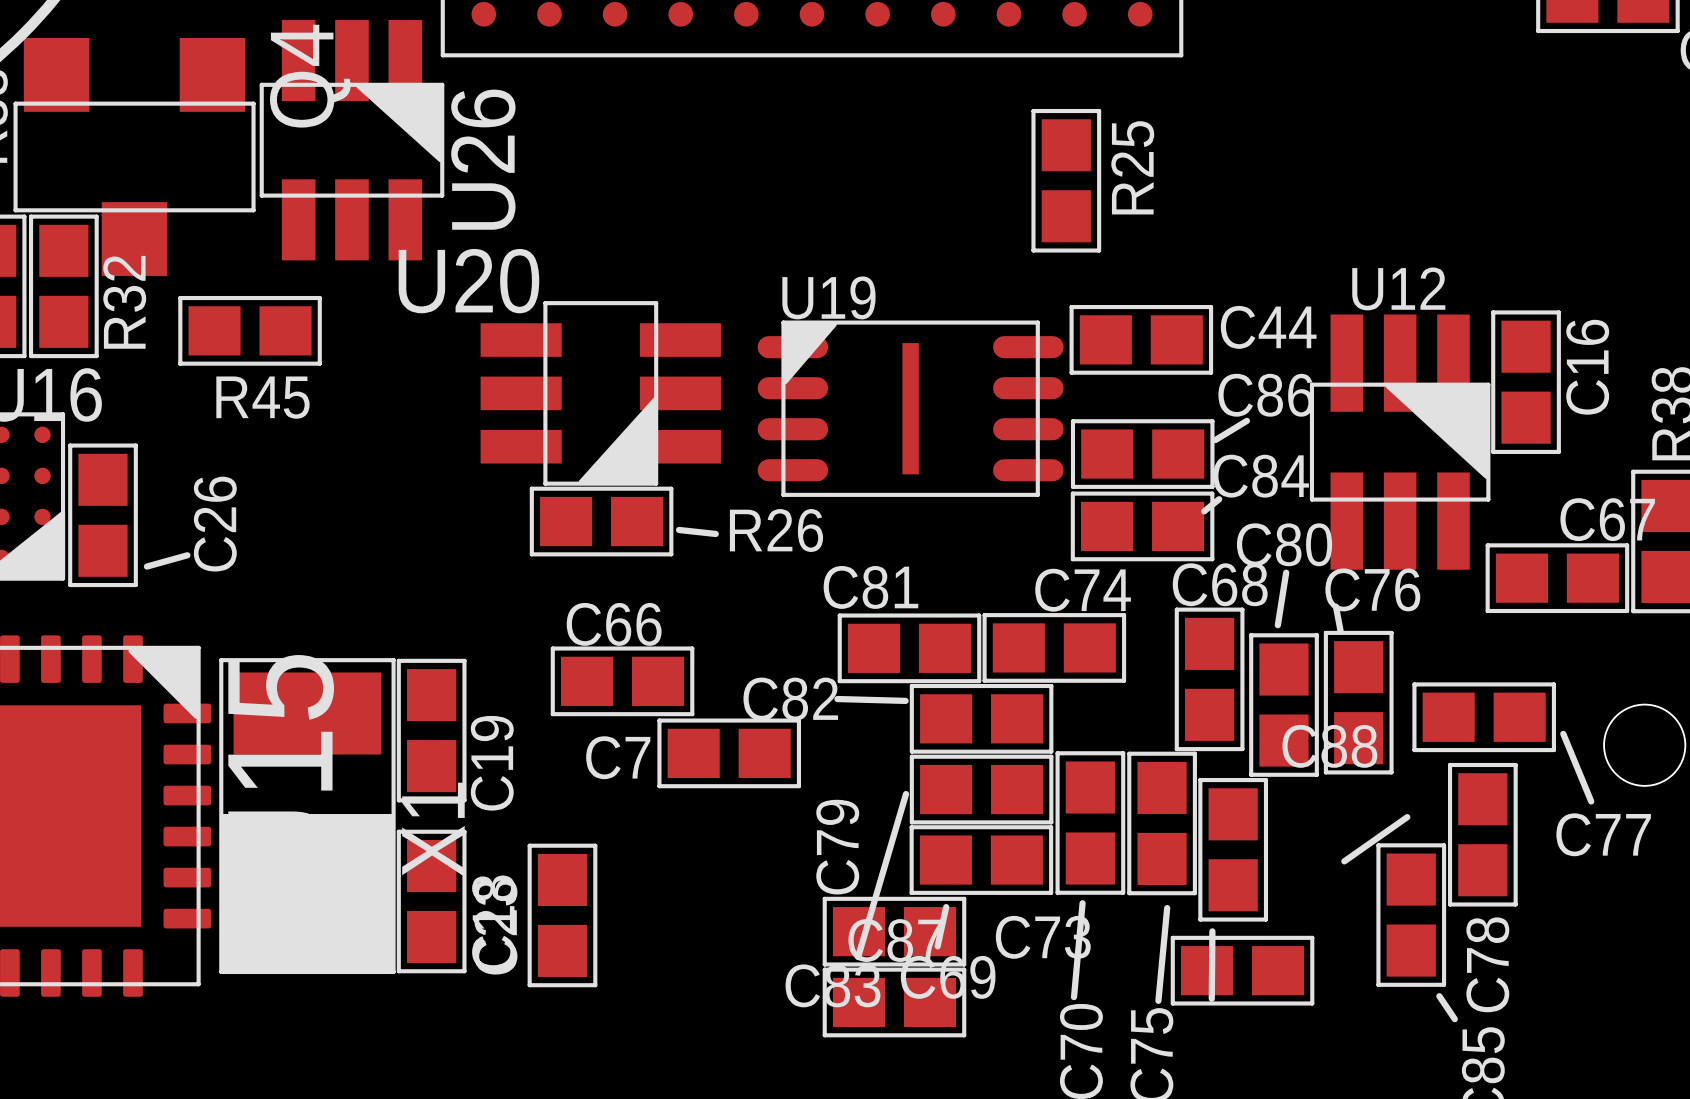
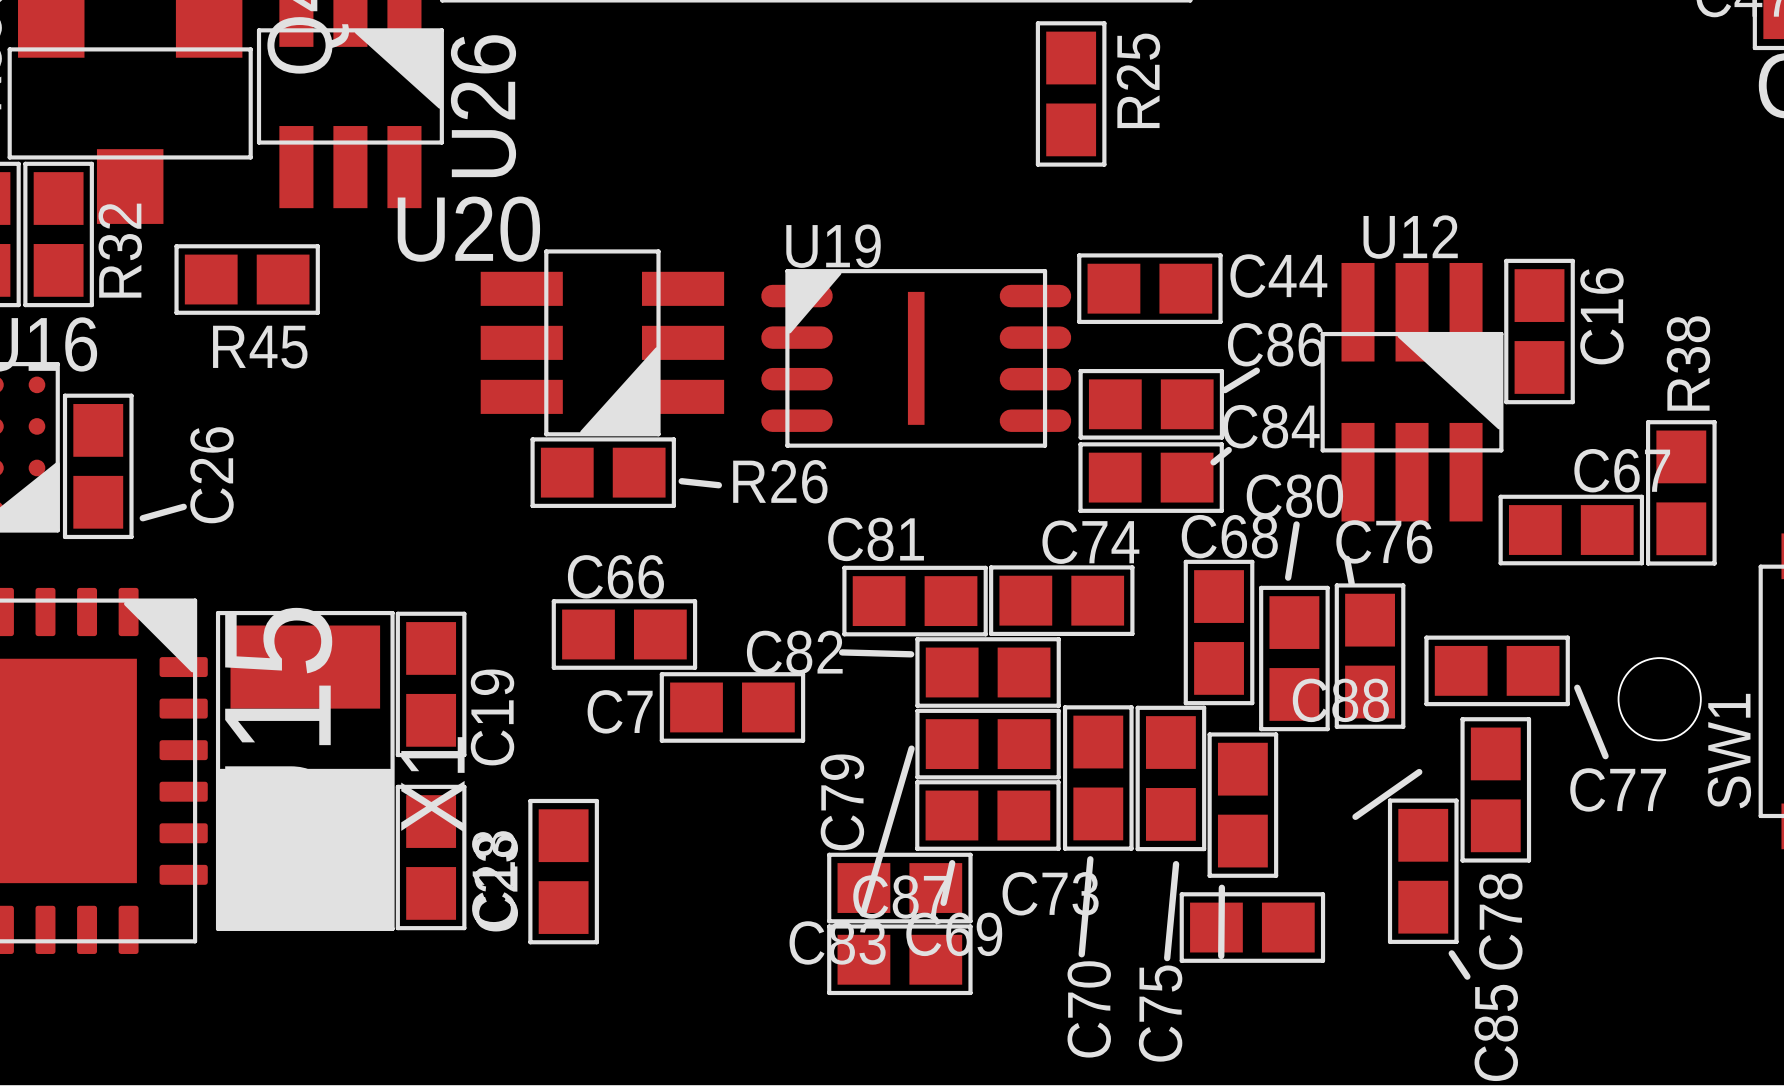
R25 position: (1066, 180) -> (1071, 93)

